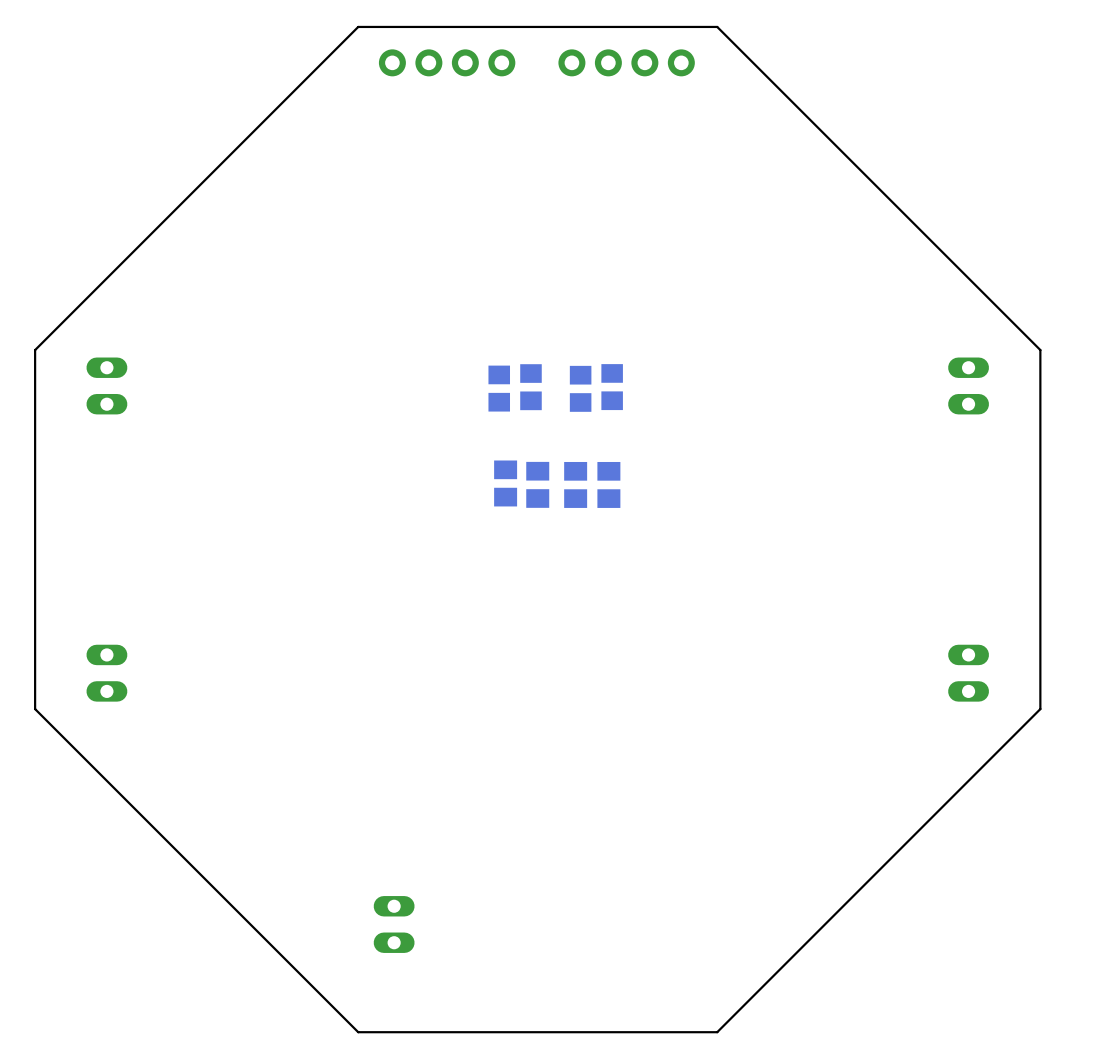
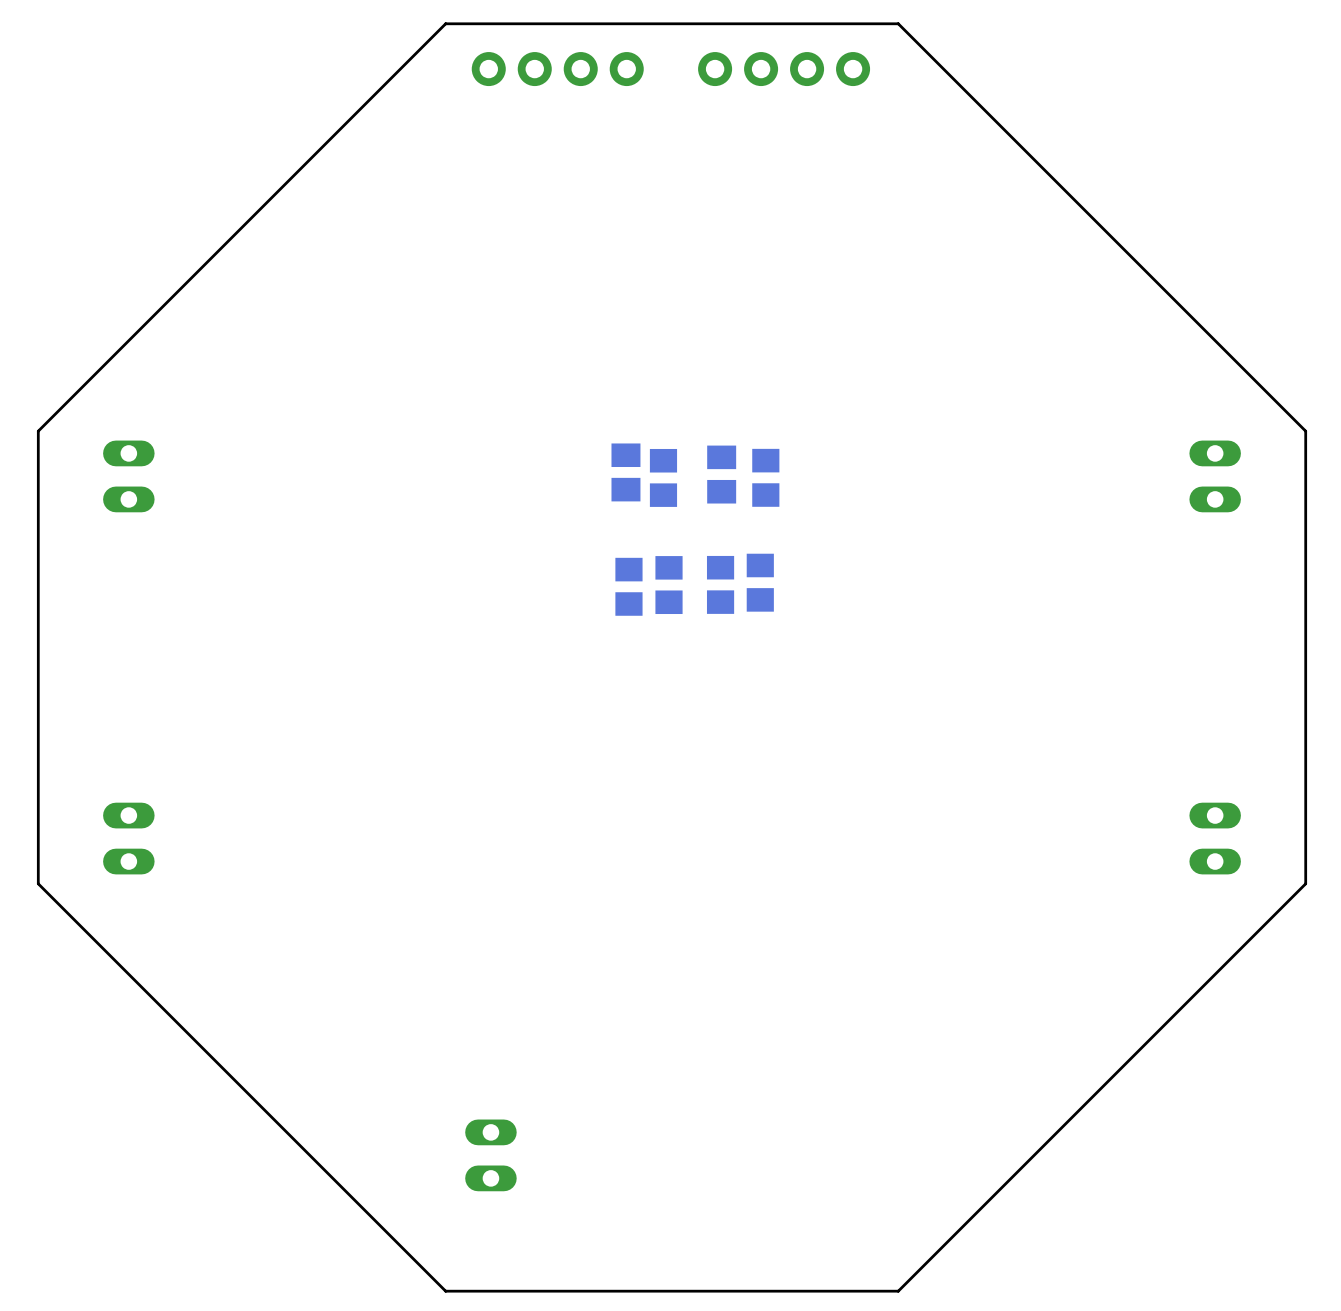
part footprint: [488, 365, 511, 412] -> [611, 443, 641, 502]
part footprint: [569, 365, 592, 412] -> [707, 445, 737, 504]
part footprint: [494, 460, 518, 507] -> [615, 557, 643, 616]
part footprint: [526, 461, 550, 508] -> [655, 556, 683, 615]
part footprint: [564, 461, 588, 508] -> [706, 555, 735, 614]
part: none -> (760, 582)
part: (608, 484) -> none

